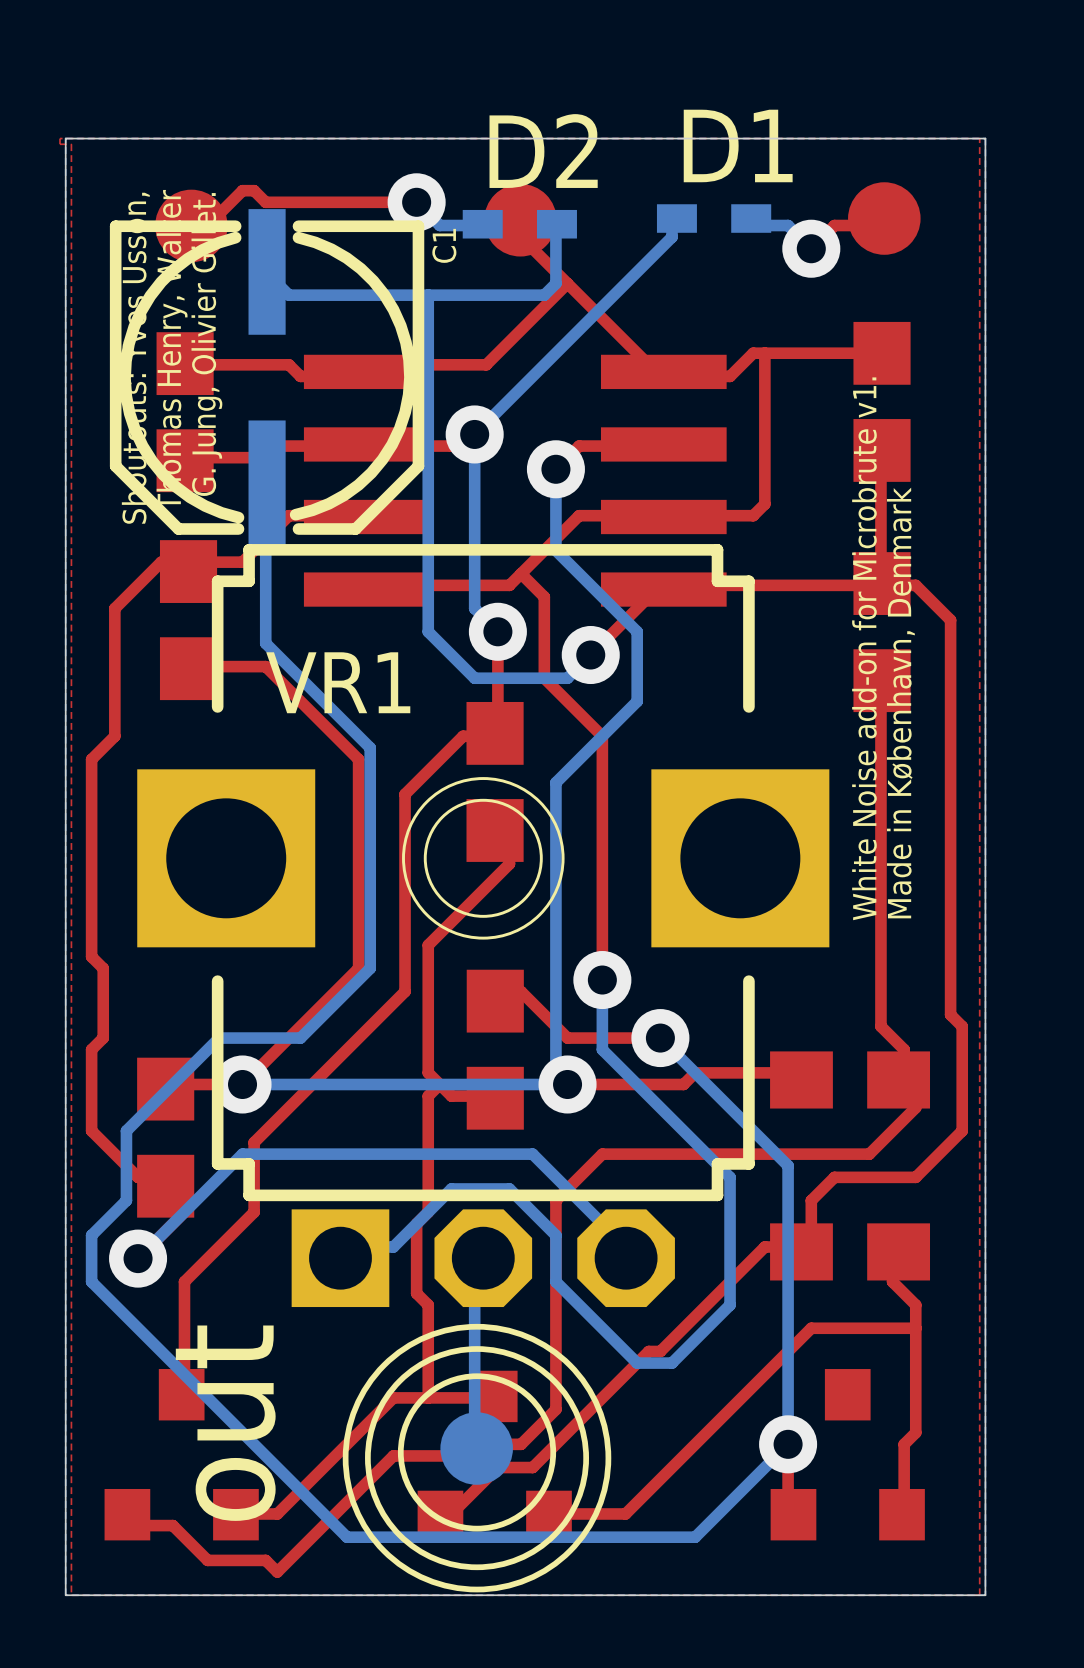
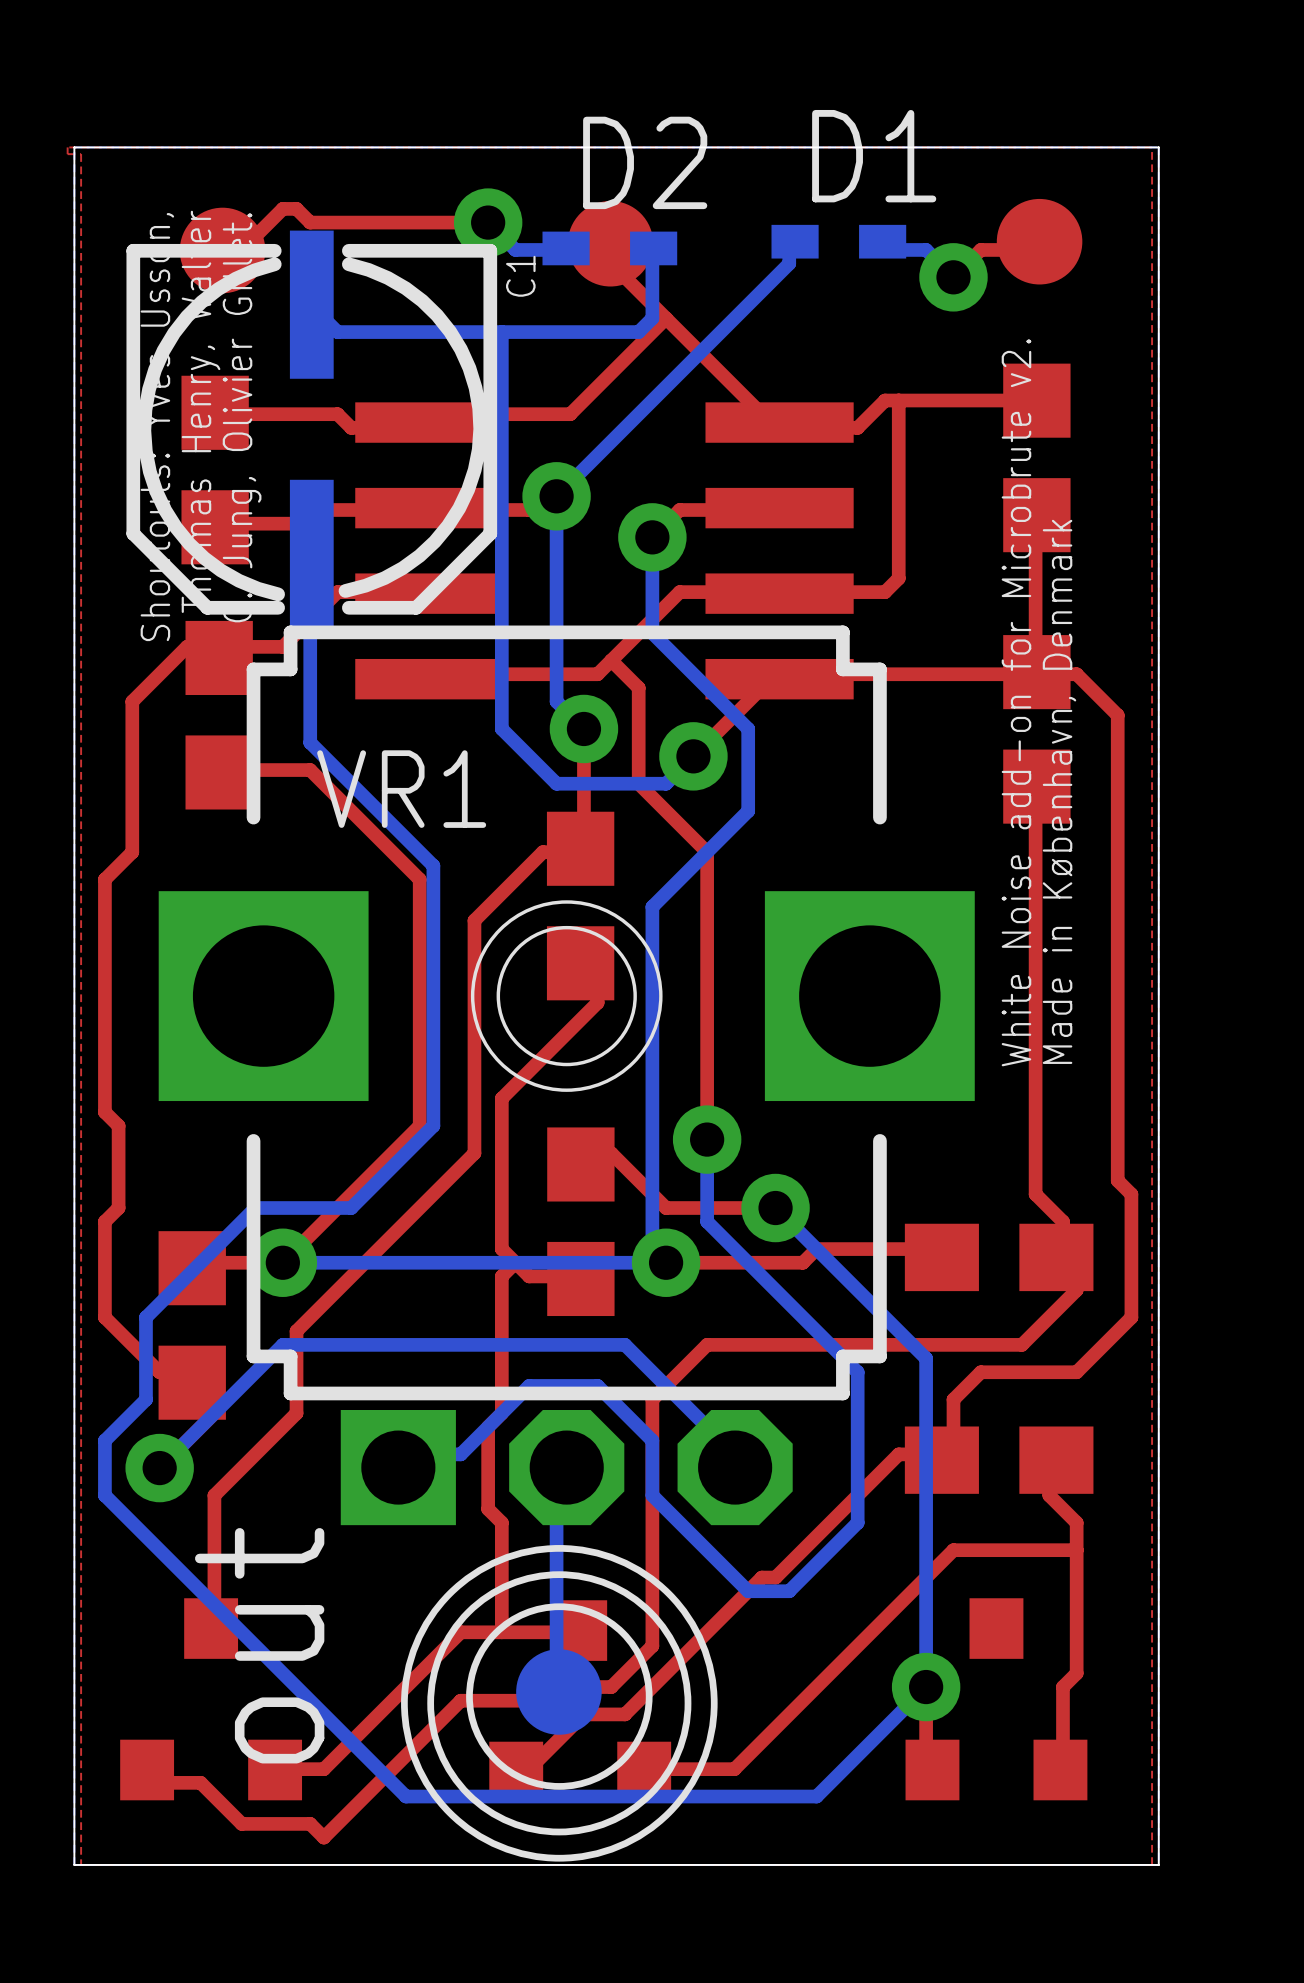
text: White Noise add-on for Microbrute v1. (864, 648) -> White Noise add-on for Microbrute v2. (1016, 702)

